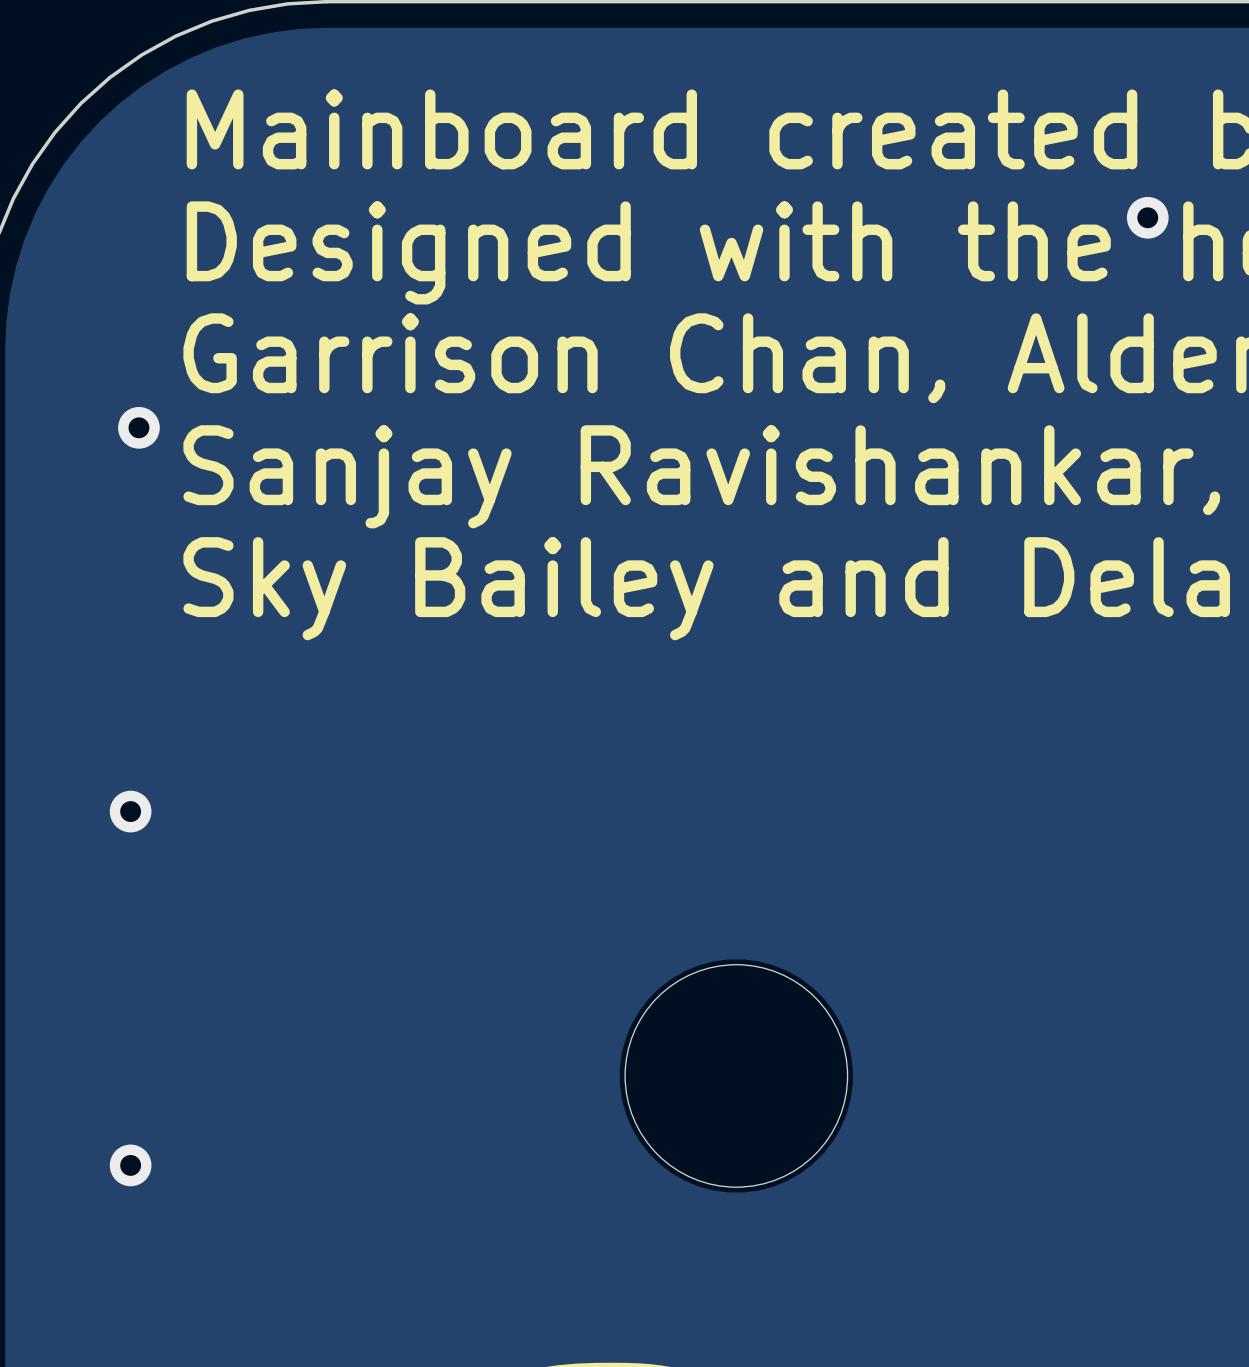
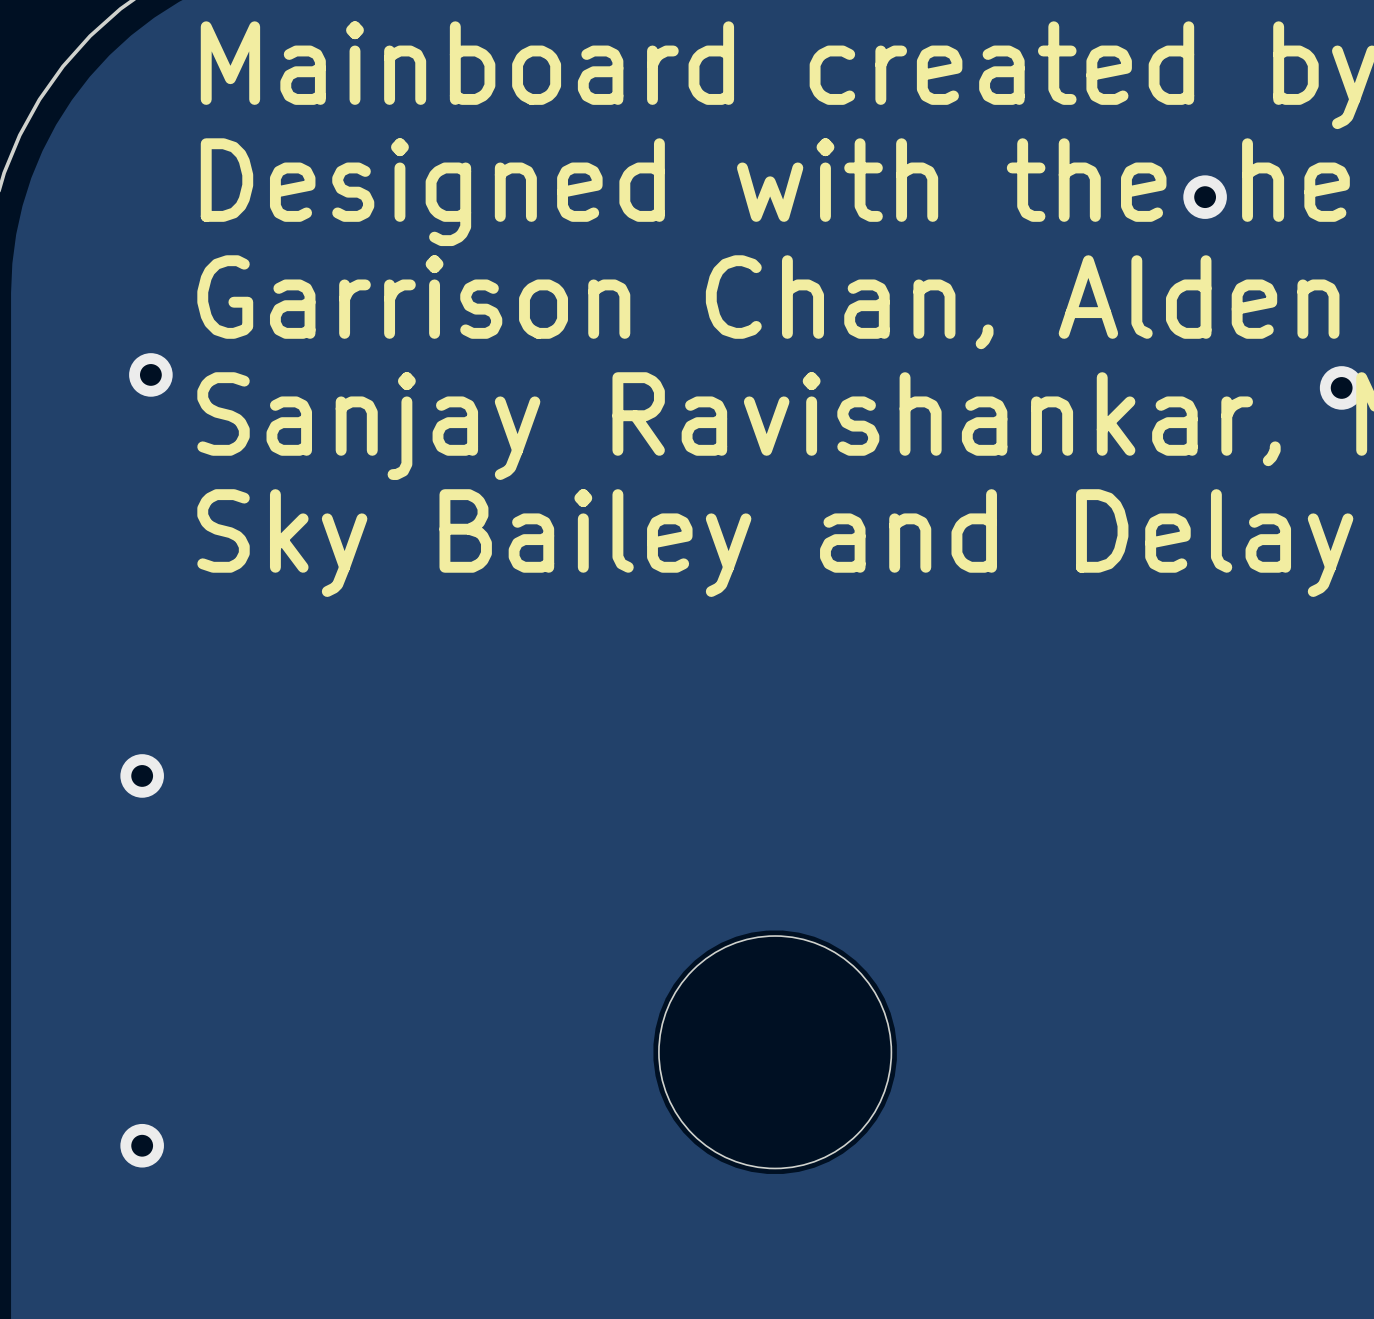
via position: (1147, 217) -> (1205, 197)

